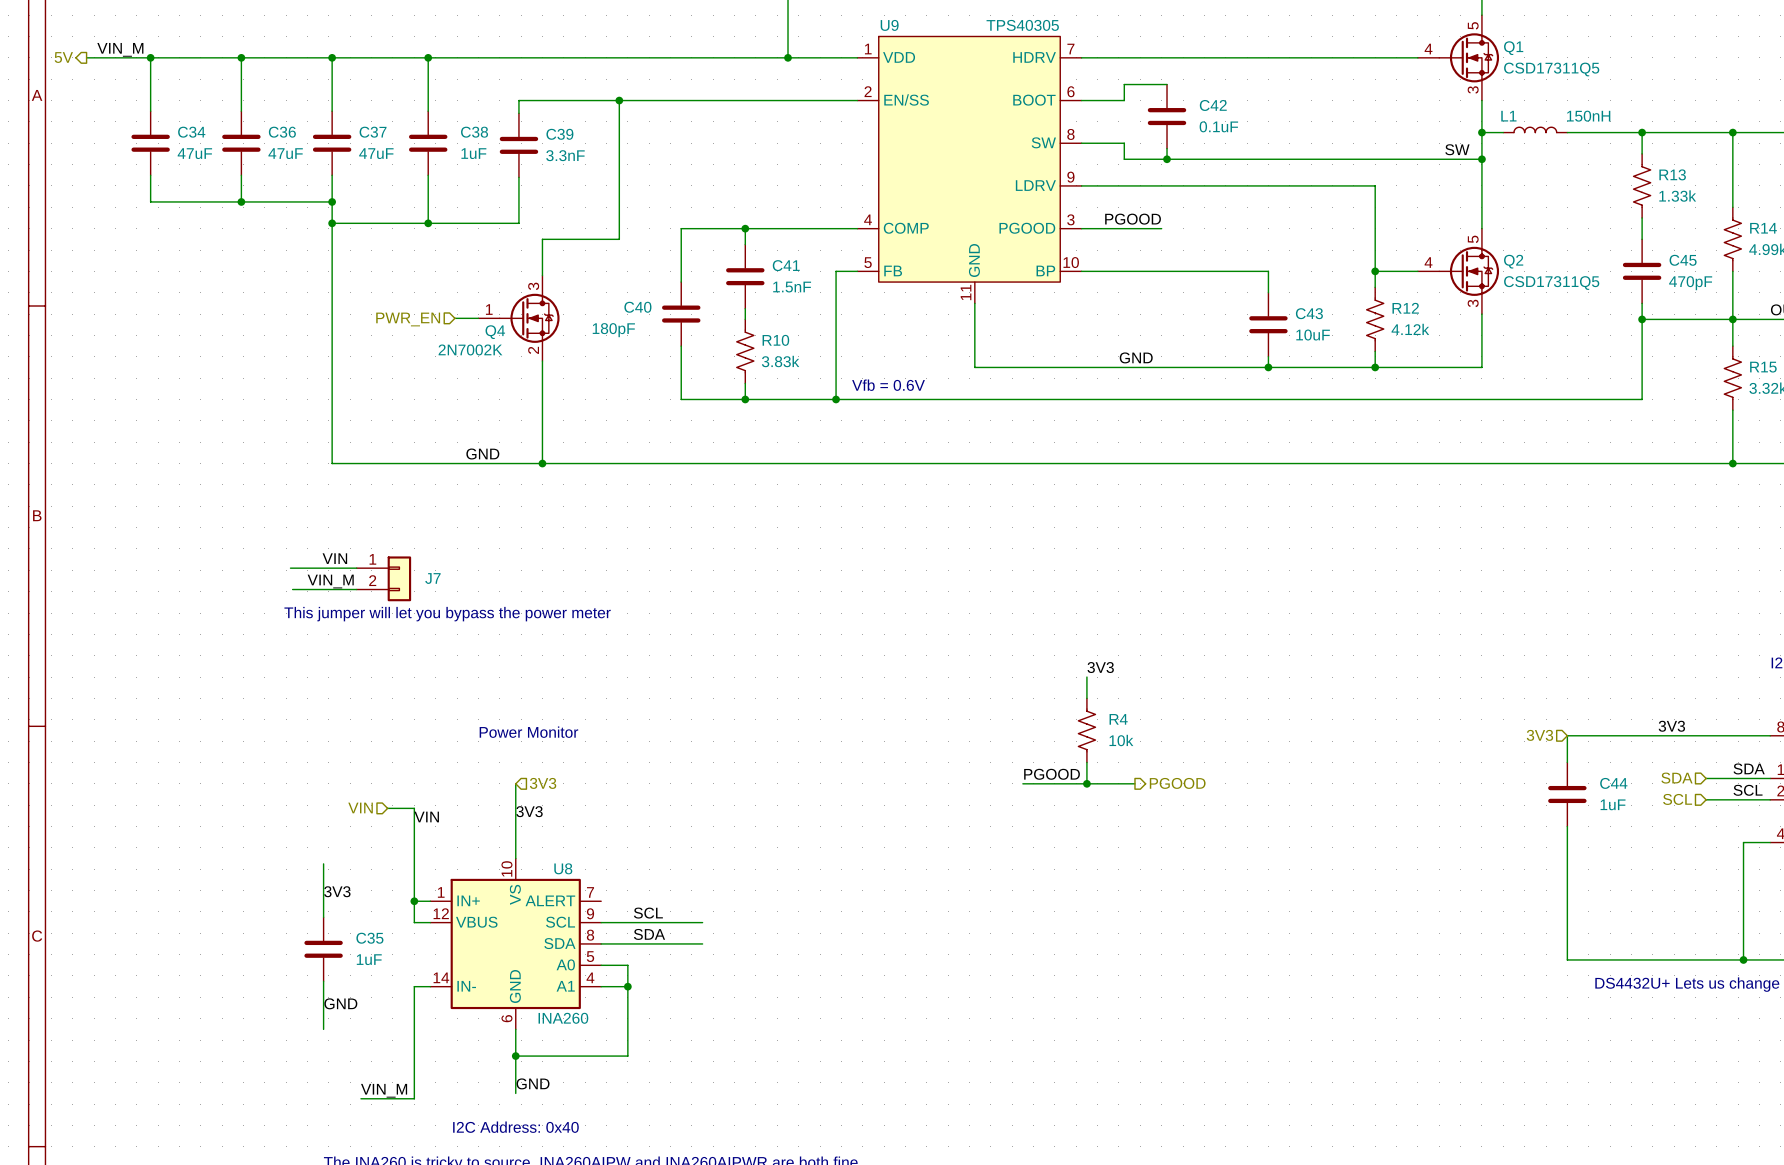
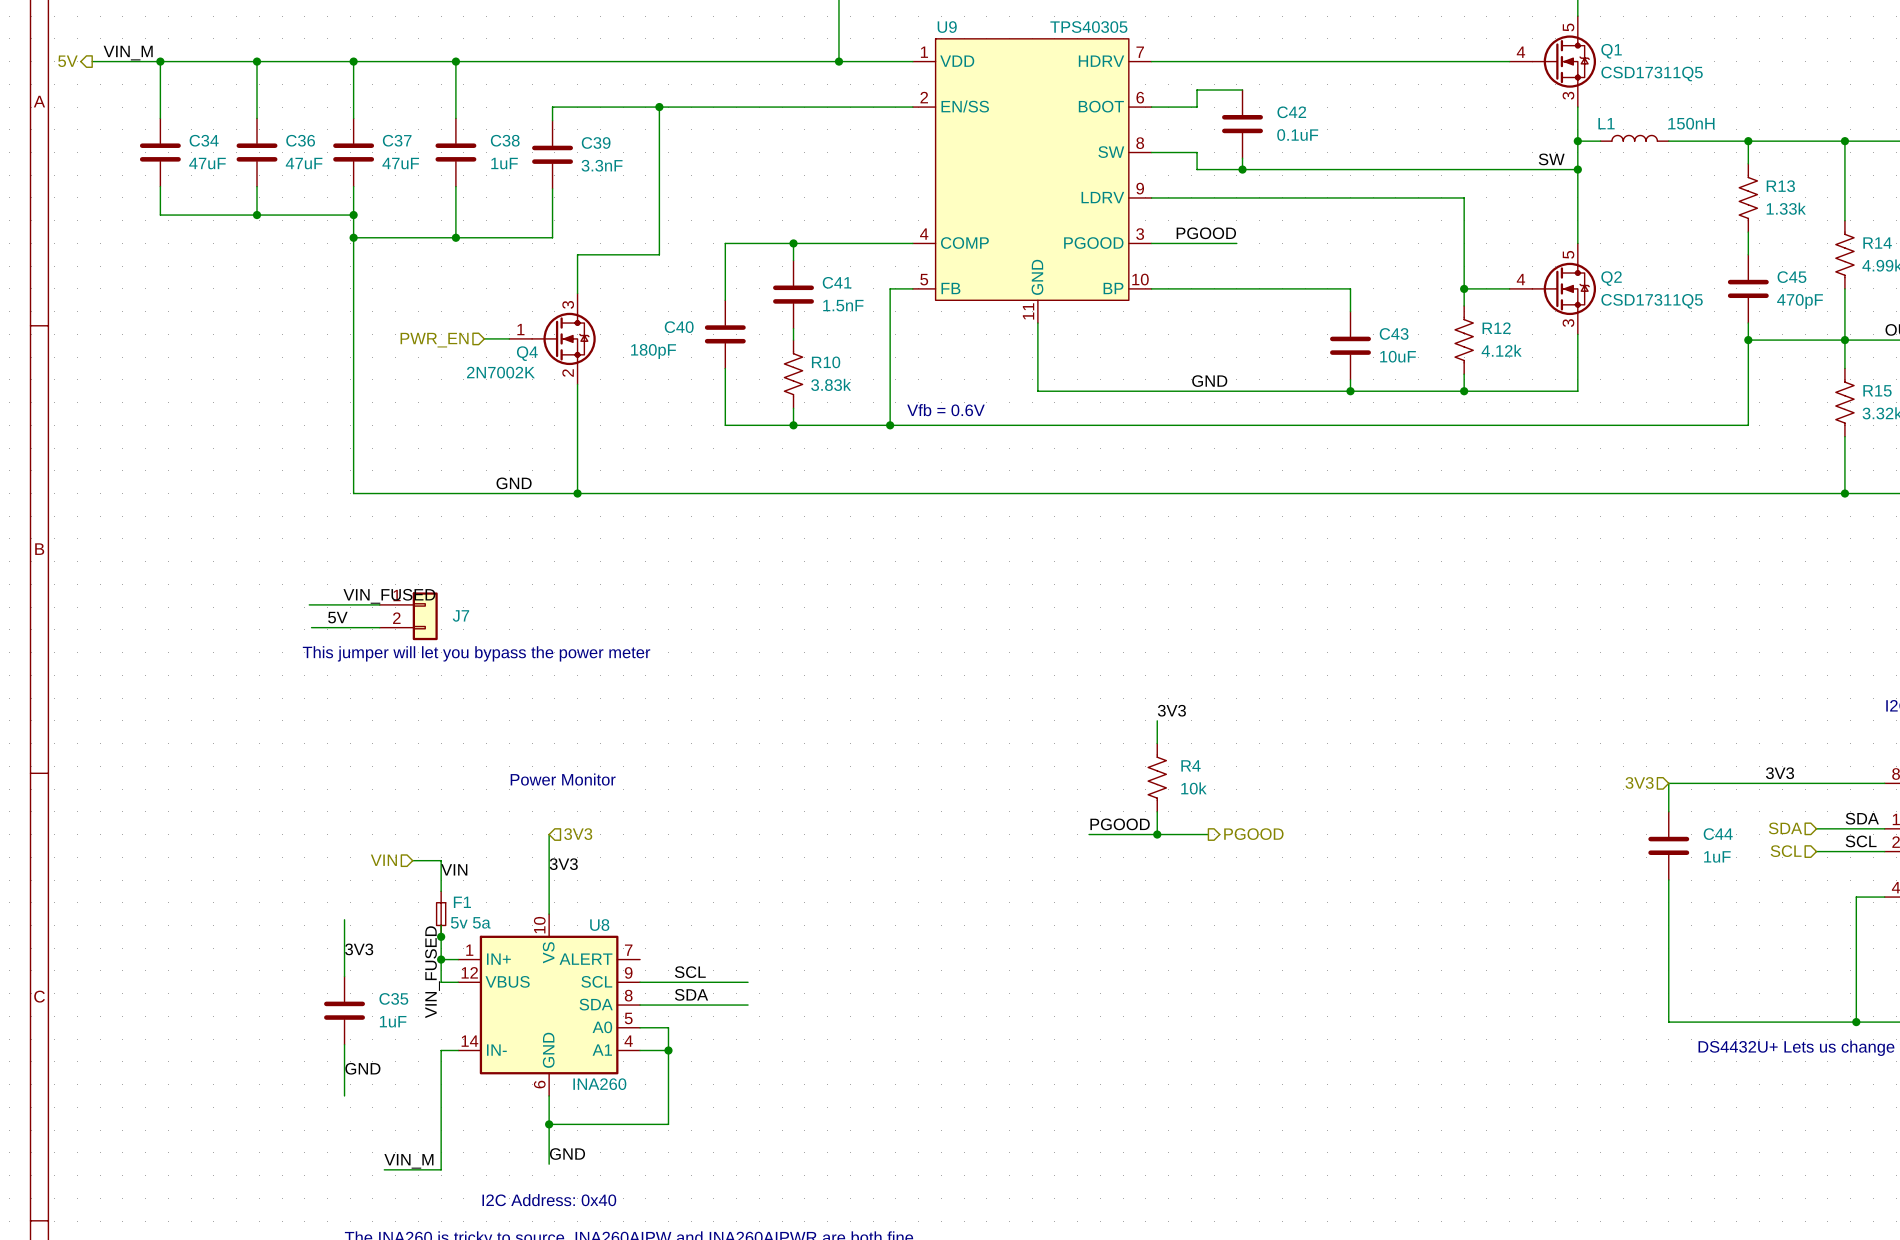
label: VIN (334, 558) -> VIN_FUSED (389, 596)
label: VIN_M (330, 581) -> 5V (337, 617)
F1: none -> 5v 5a (441, 914)
junction: none -> (441, 936)
label: none -> VIN_FUSED (432, 972)

